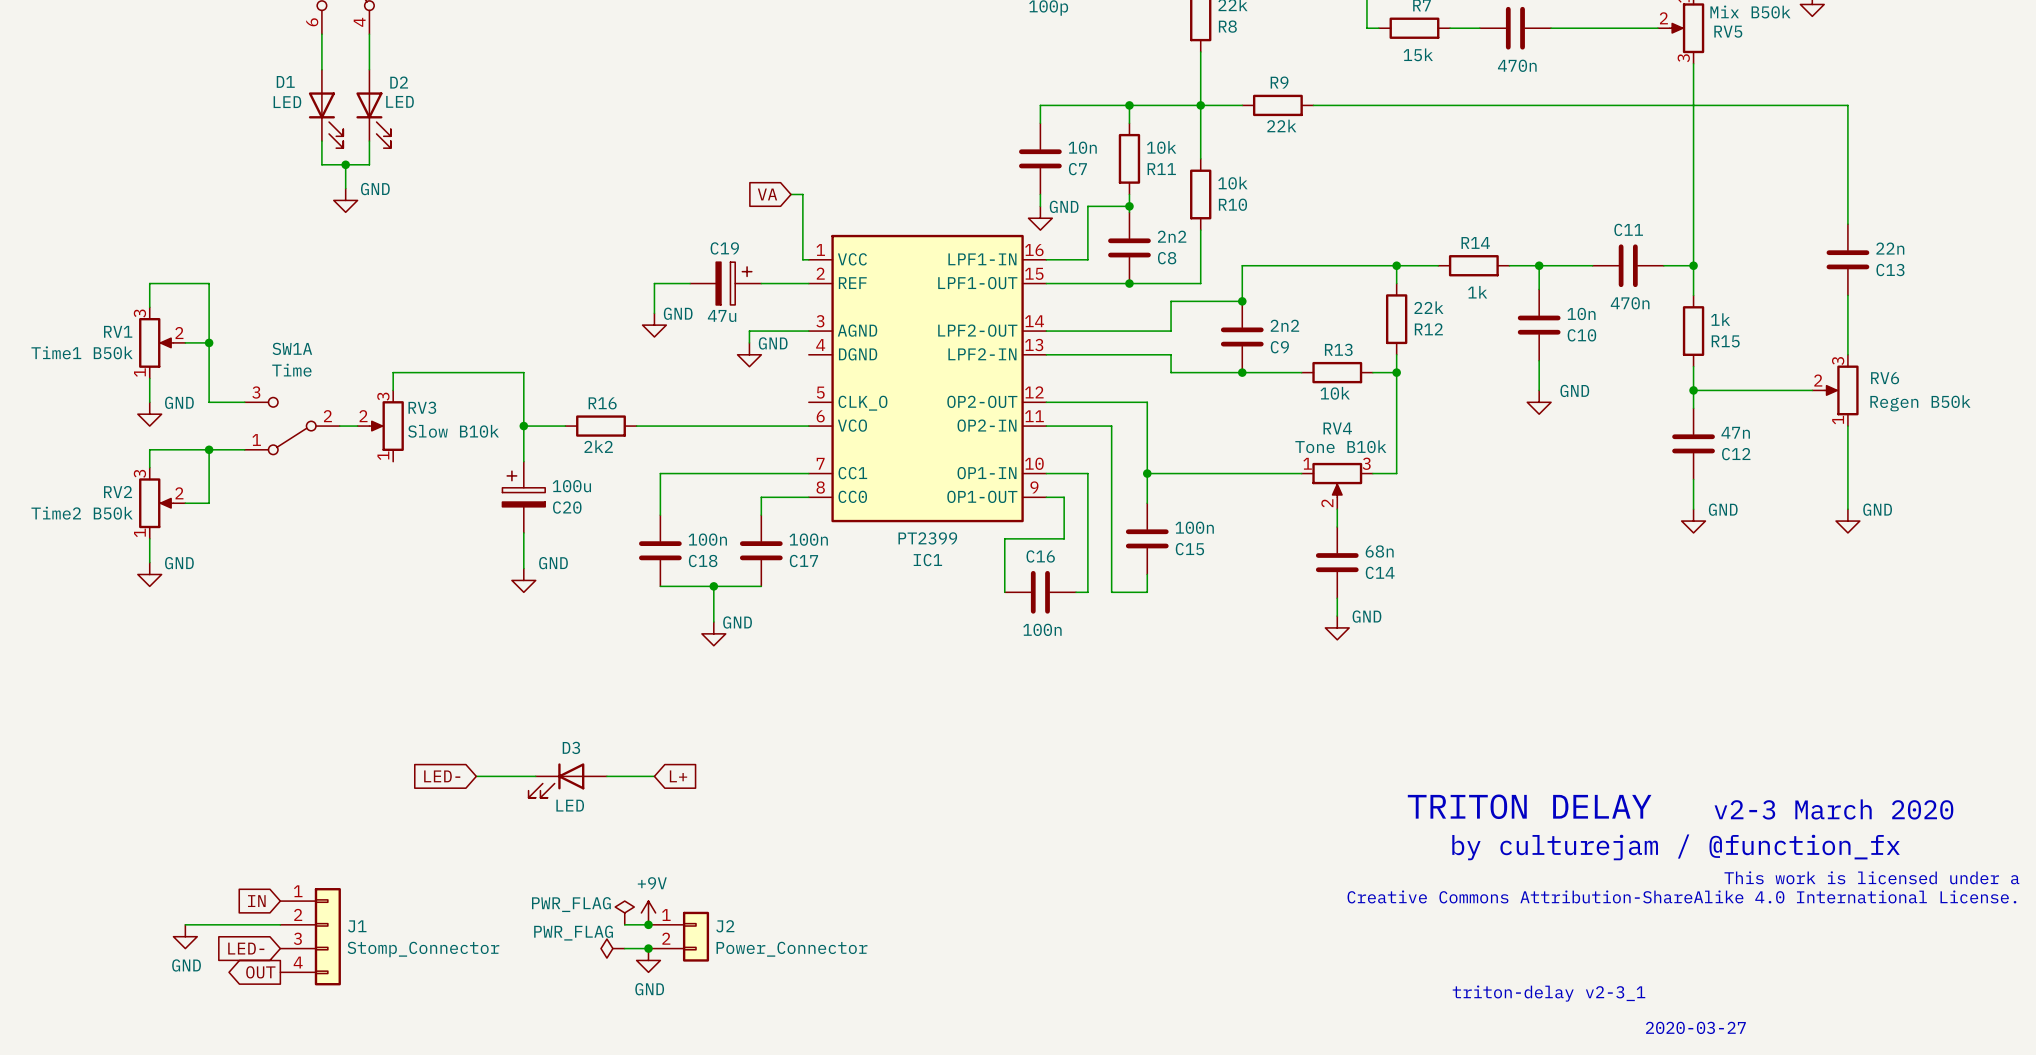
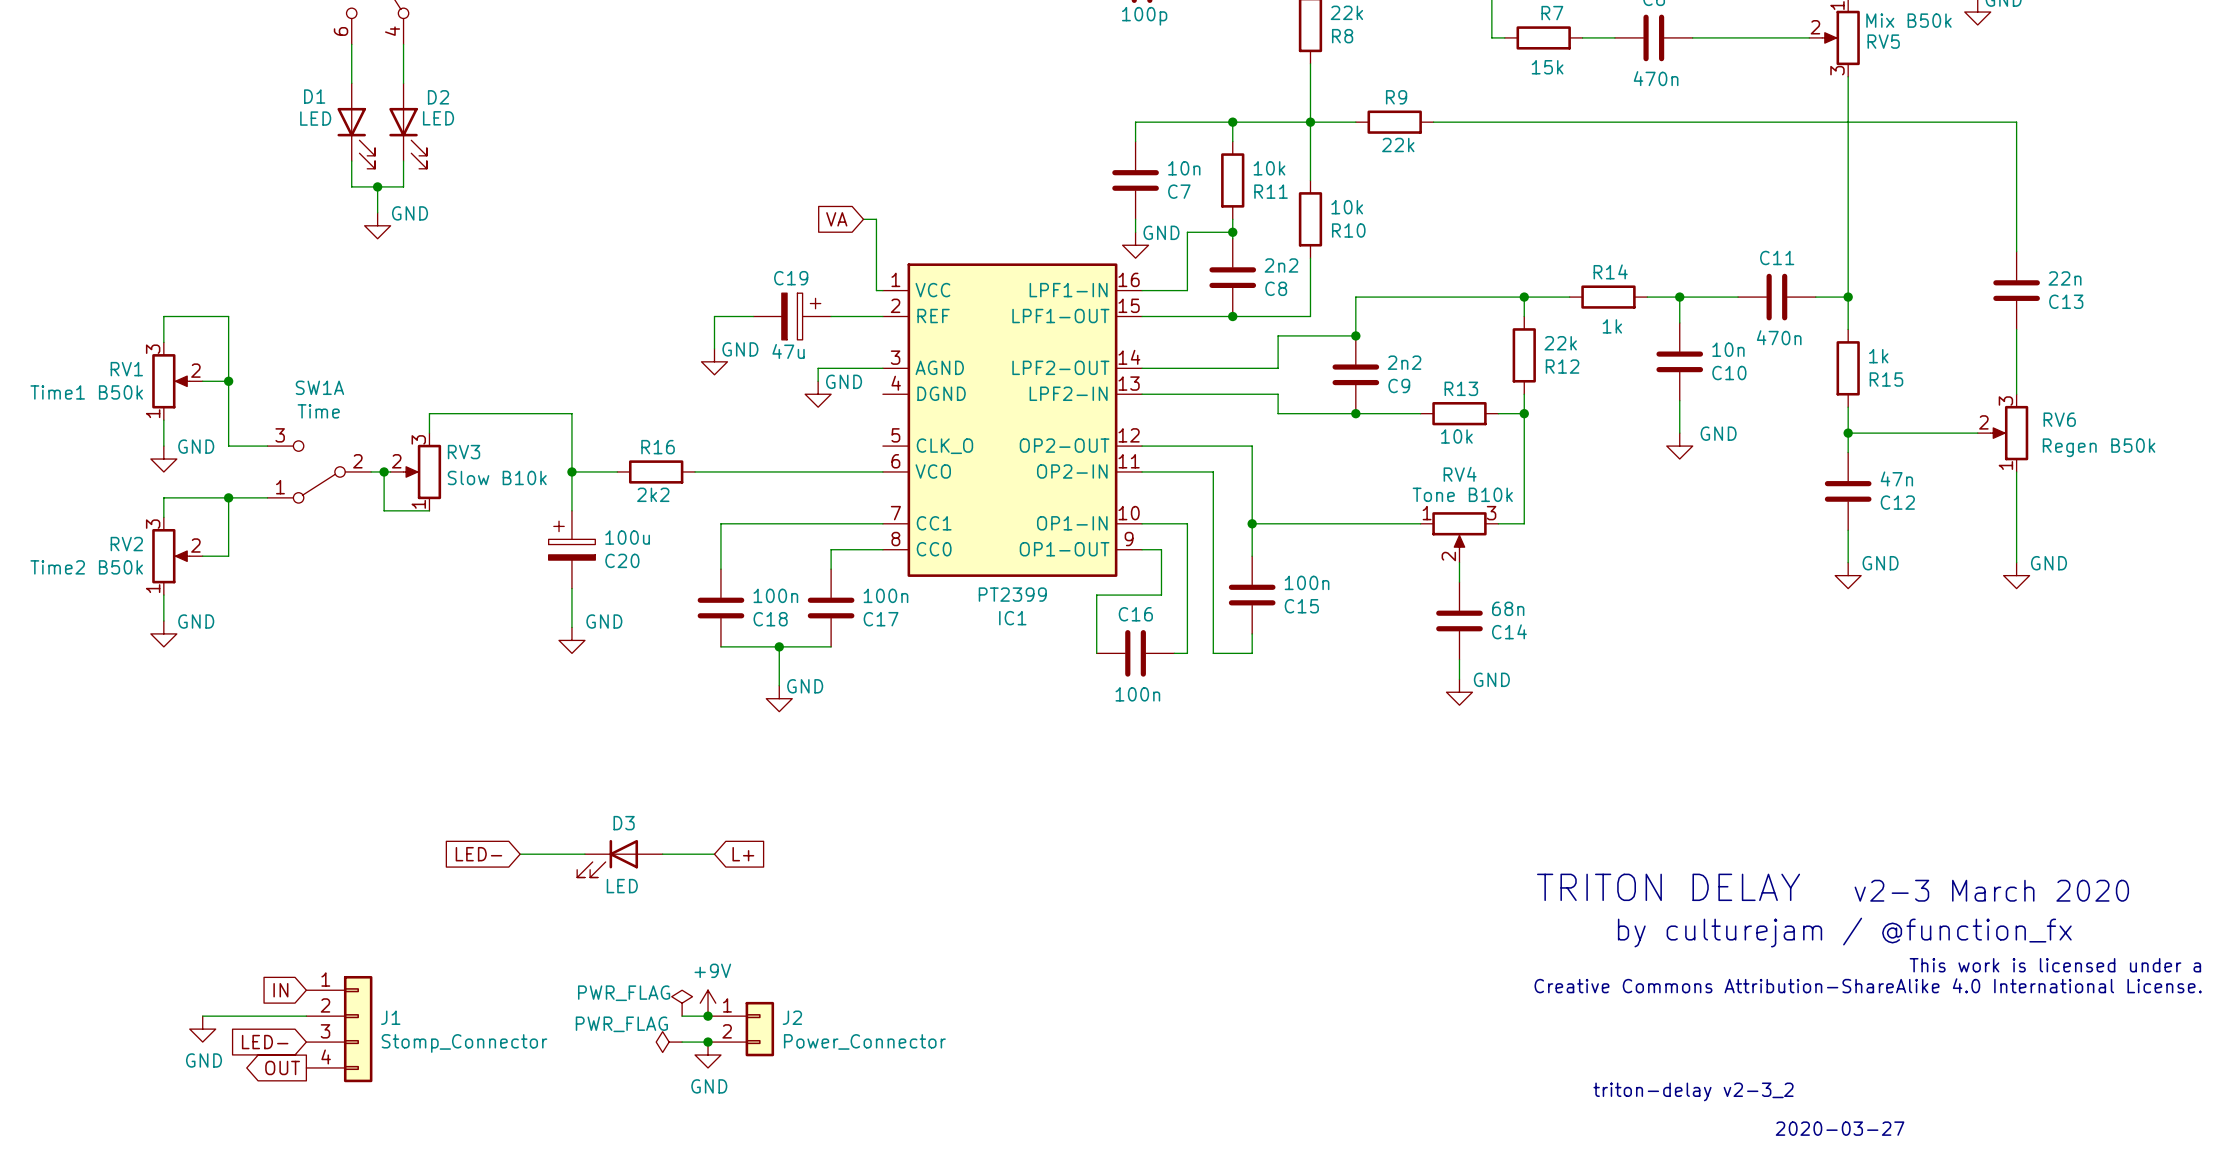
wire: none -> (384, 471) (384, 510) (429, 510)
junction: none -> (384, 471)
text: triton-delay v2-3_1 (1549, 993) -> triton-delay v2-3_2 (1693, 1091)

